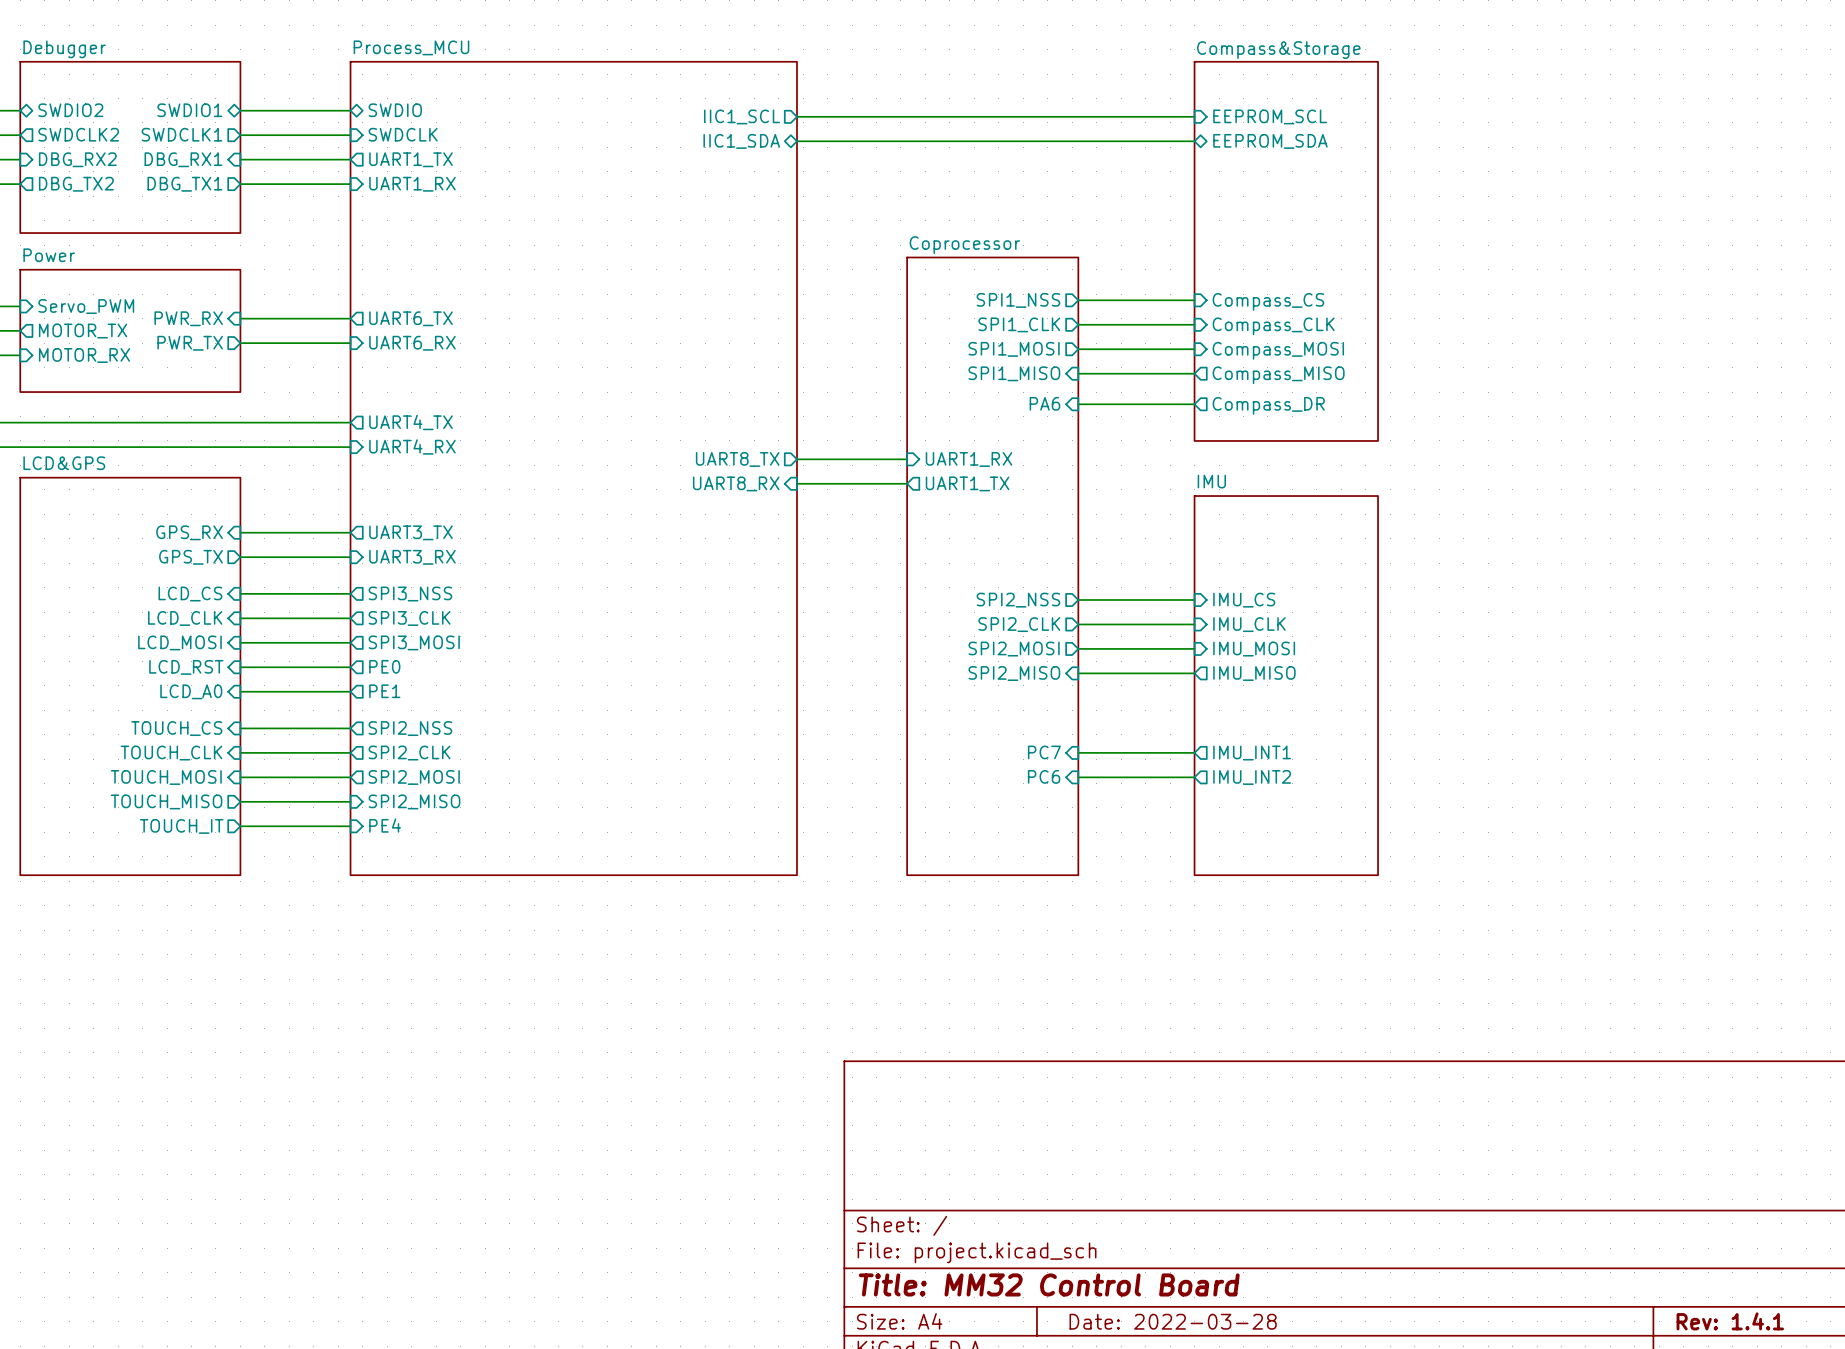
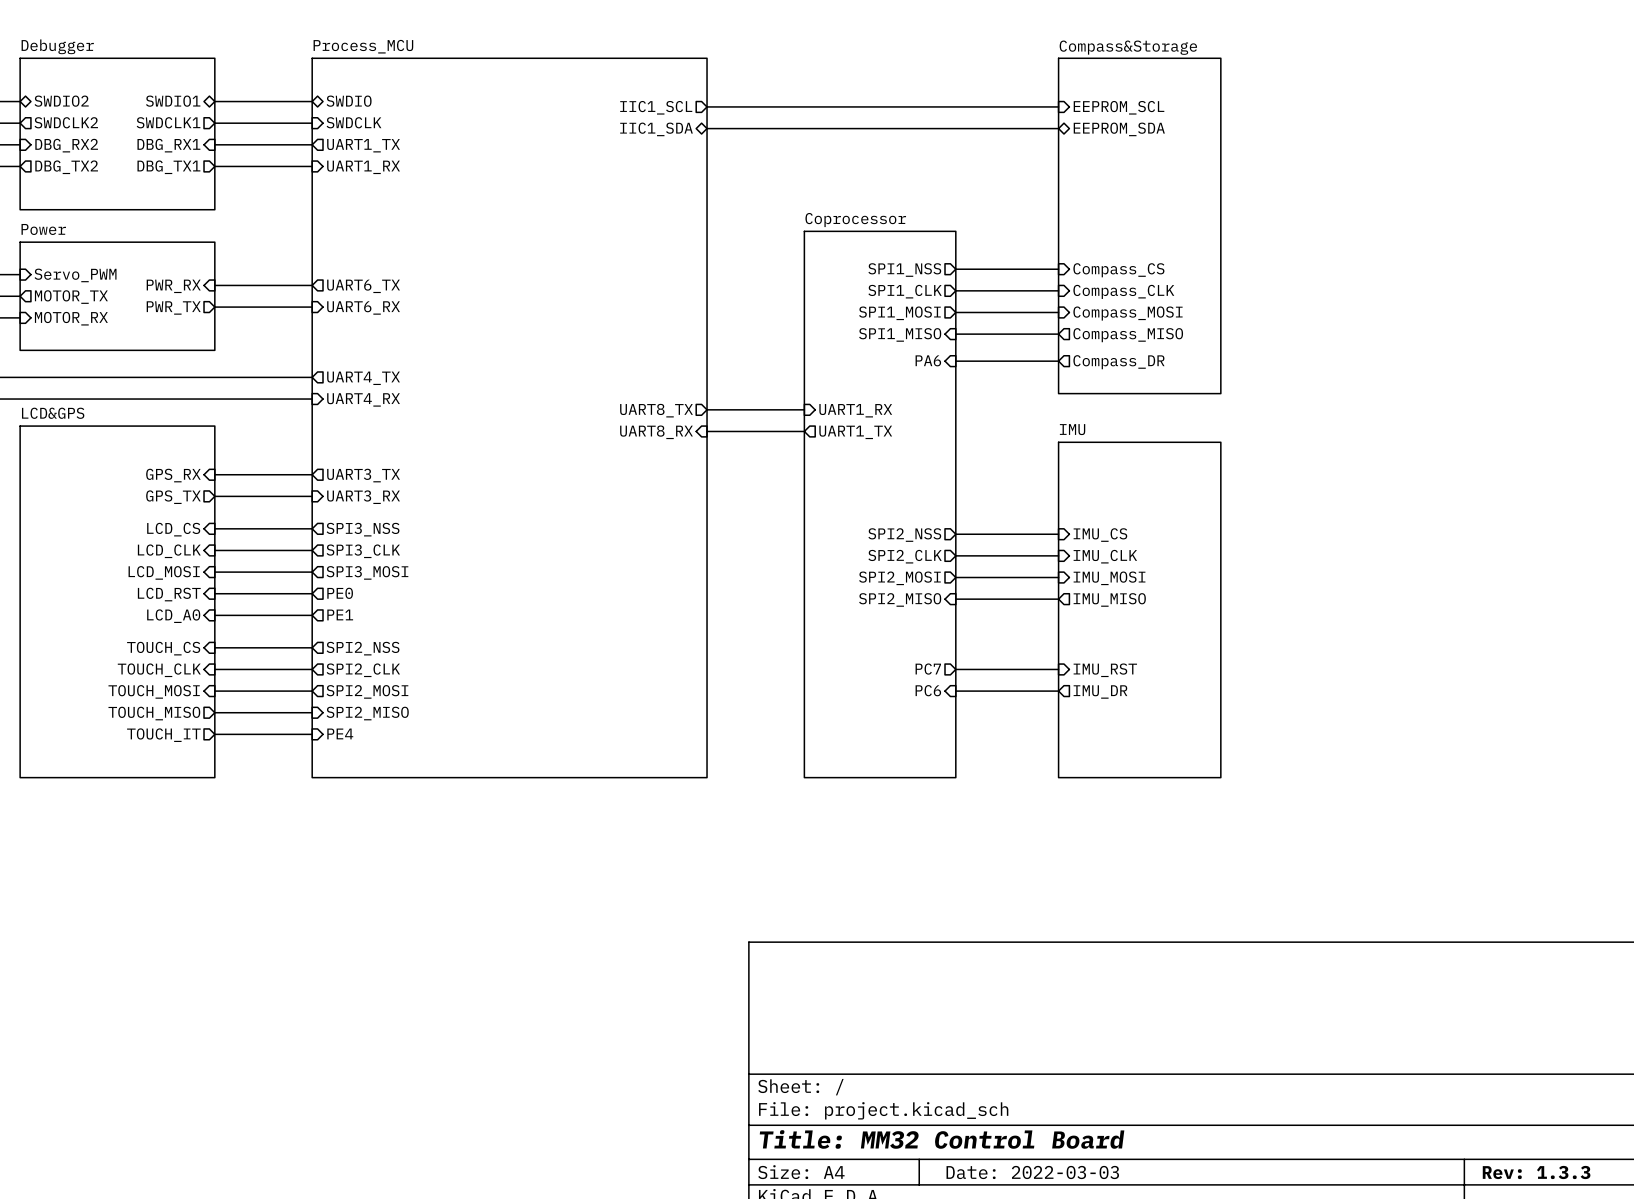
sheet pin shape: input (1044, 752) -> output (928, 669)
sheet pin shape: output (1252, 753) -> input (1105, 670)
sheet pin: IMU_INT1 (1252, 753) -> IMU_RST (1105, 670)
sheet pin: IMU_INT2 (1252, 777) -> IMU_DR (1100, 691)
title block: Date: 2022-03-28 (1173, 1321) -> Date: 2022-03-03 (1032, 1172)
title block: Rev: 1.4.1 (1730, 1321) -> Rev: 1.3.3 (1536, 1172)

